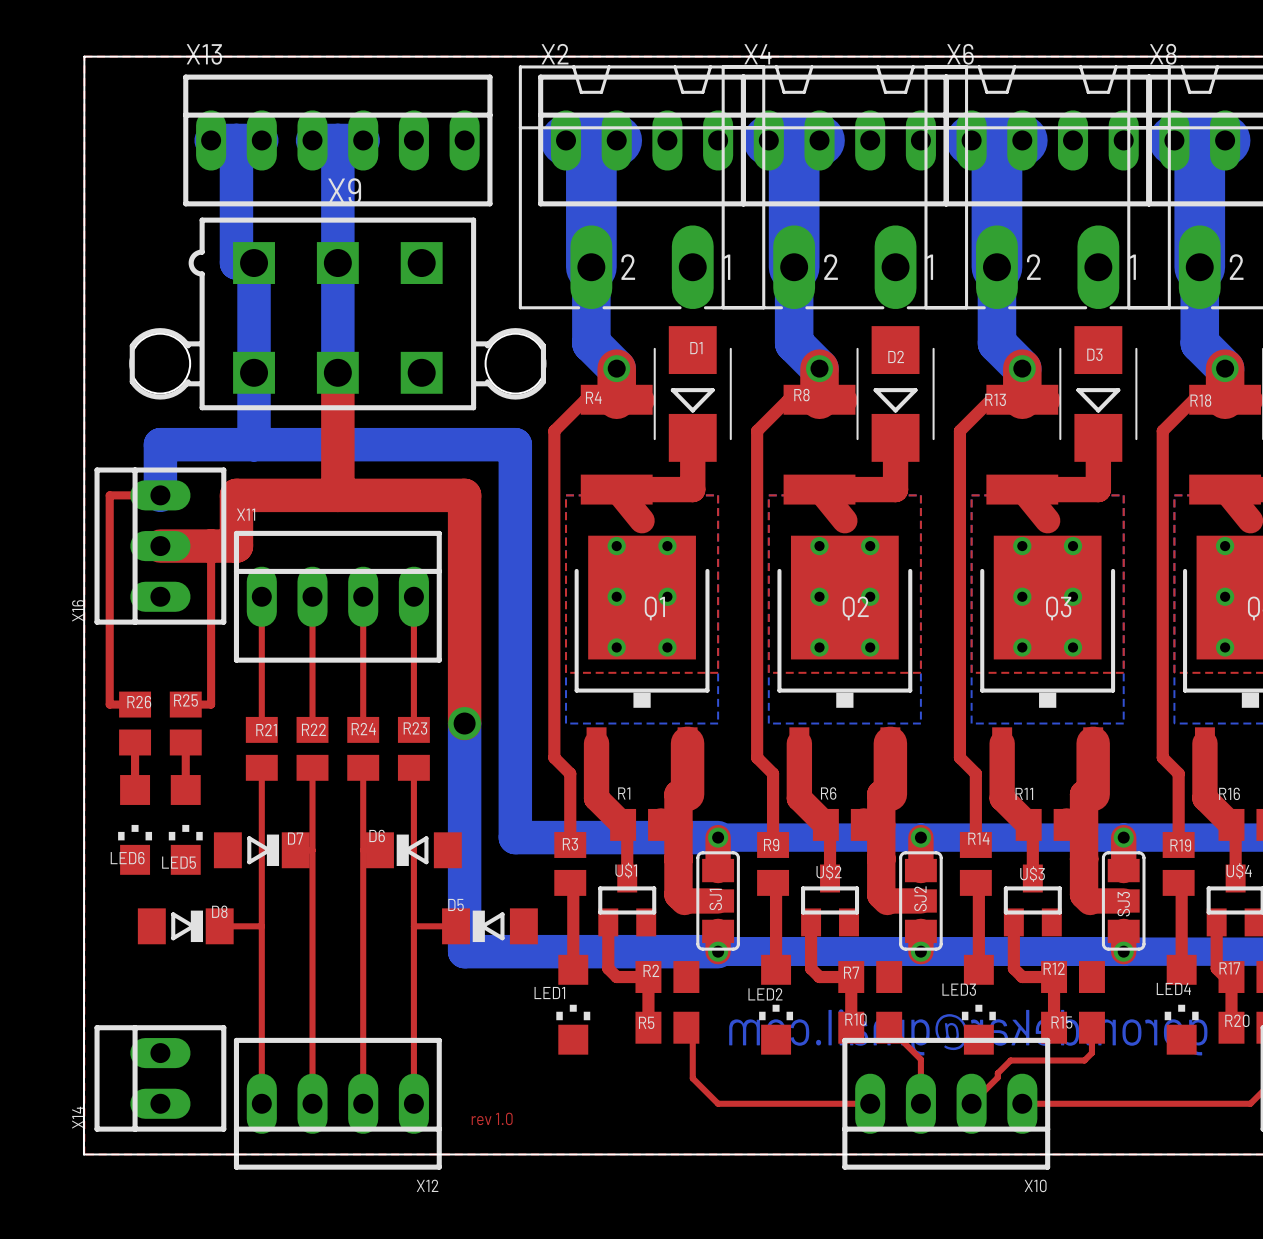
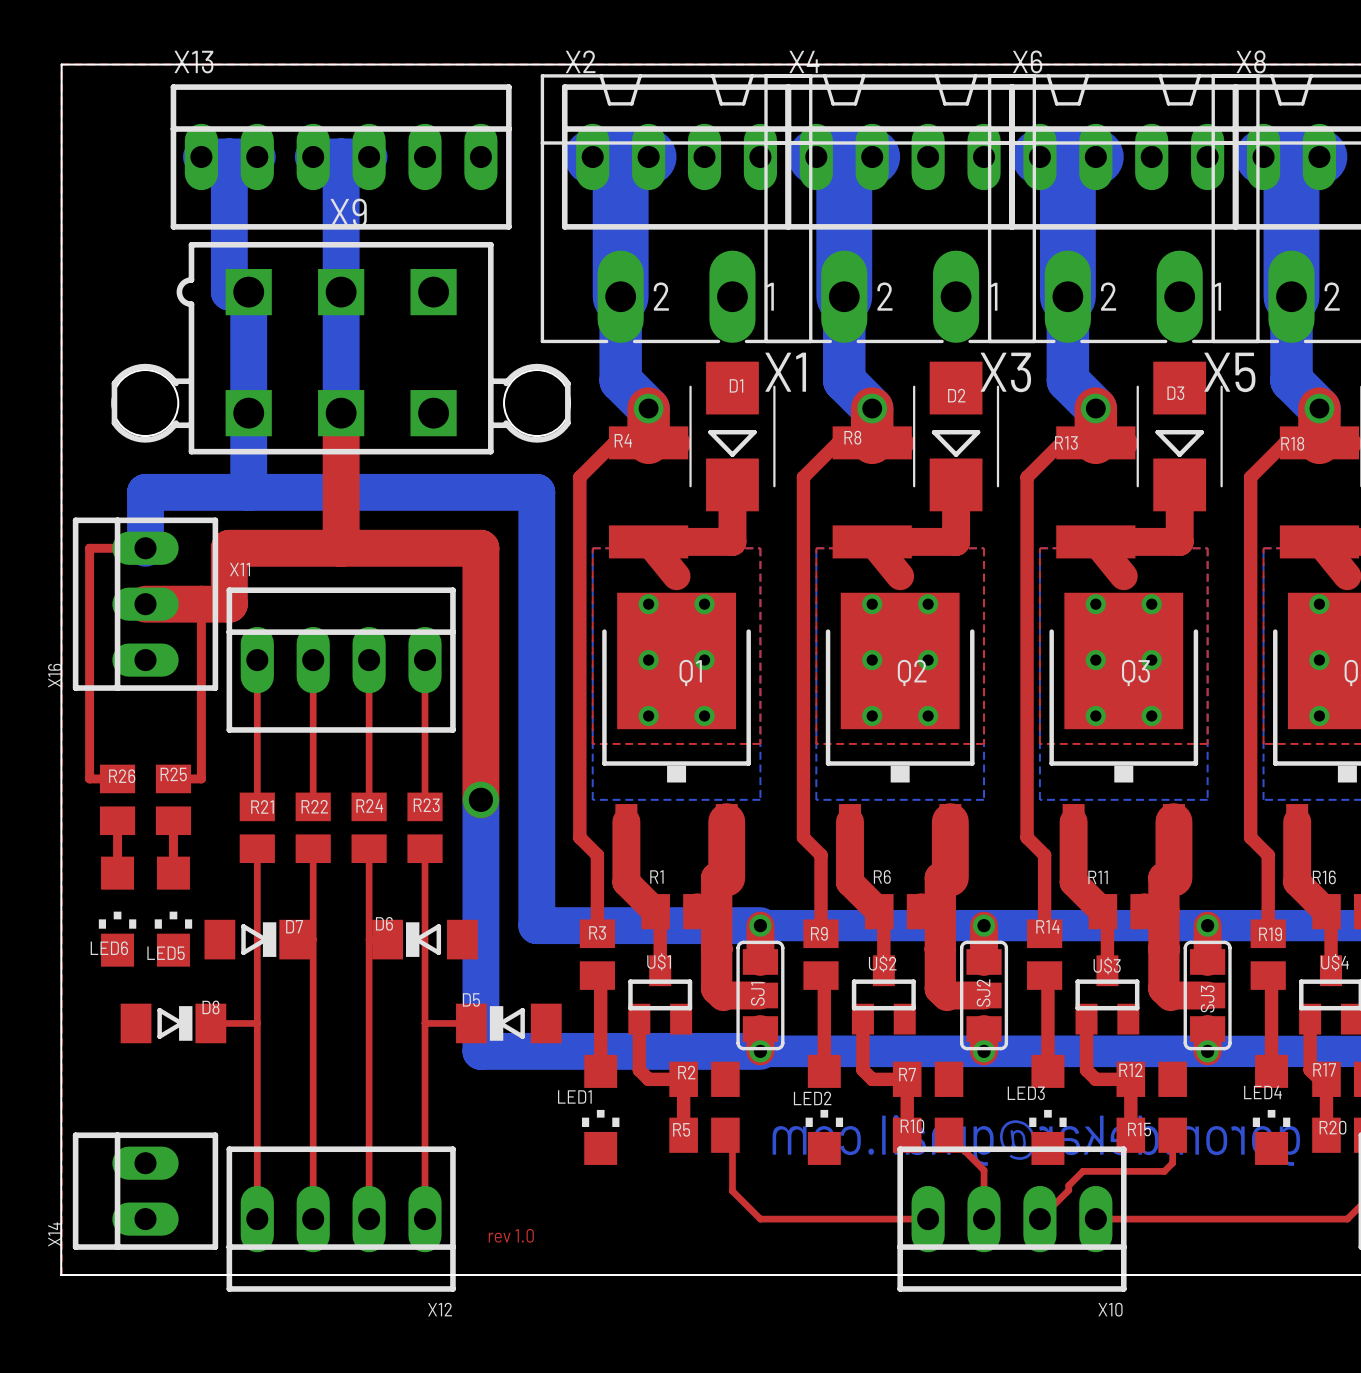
X1 name: none -> X1 (785, 372)
X3 name: none -> X3 (1005, 372)
X5 name: none -> X5 (1229, 372)

